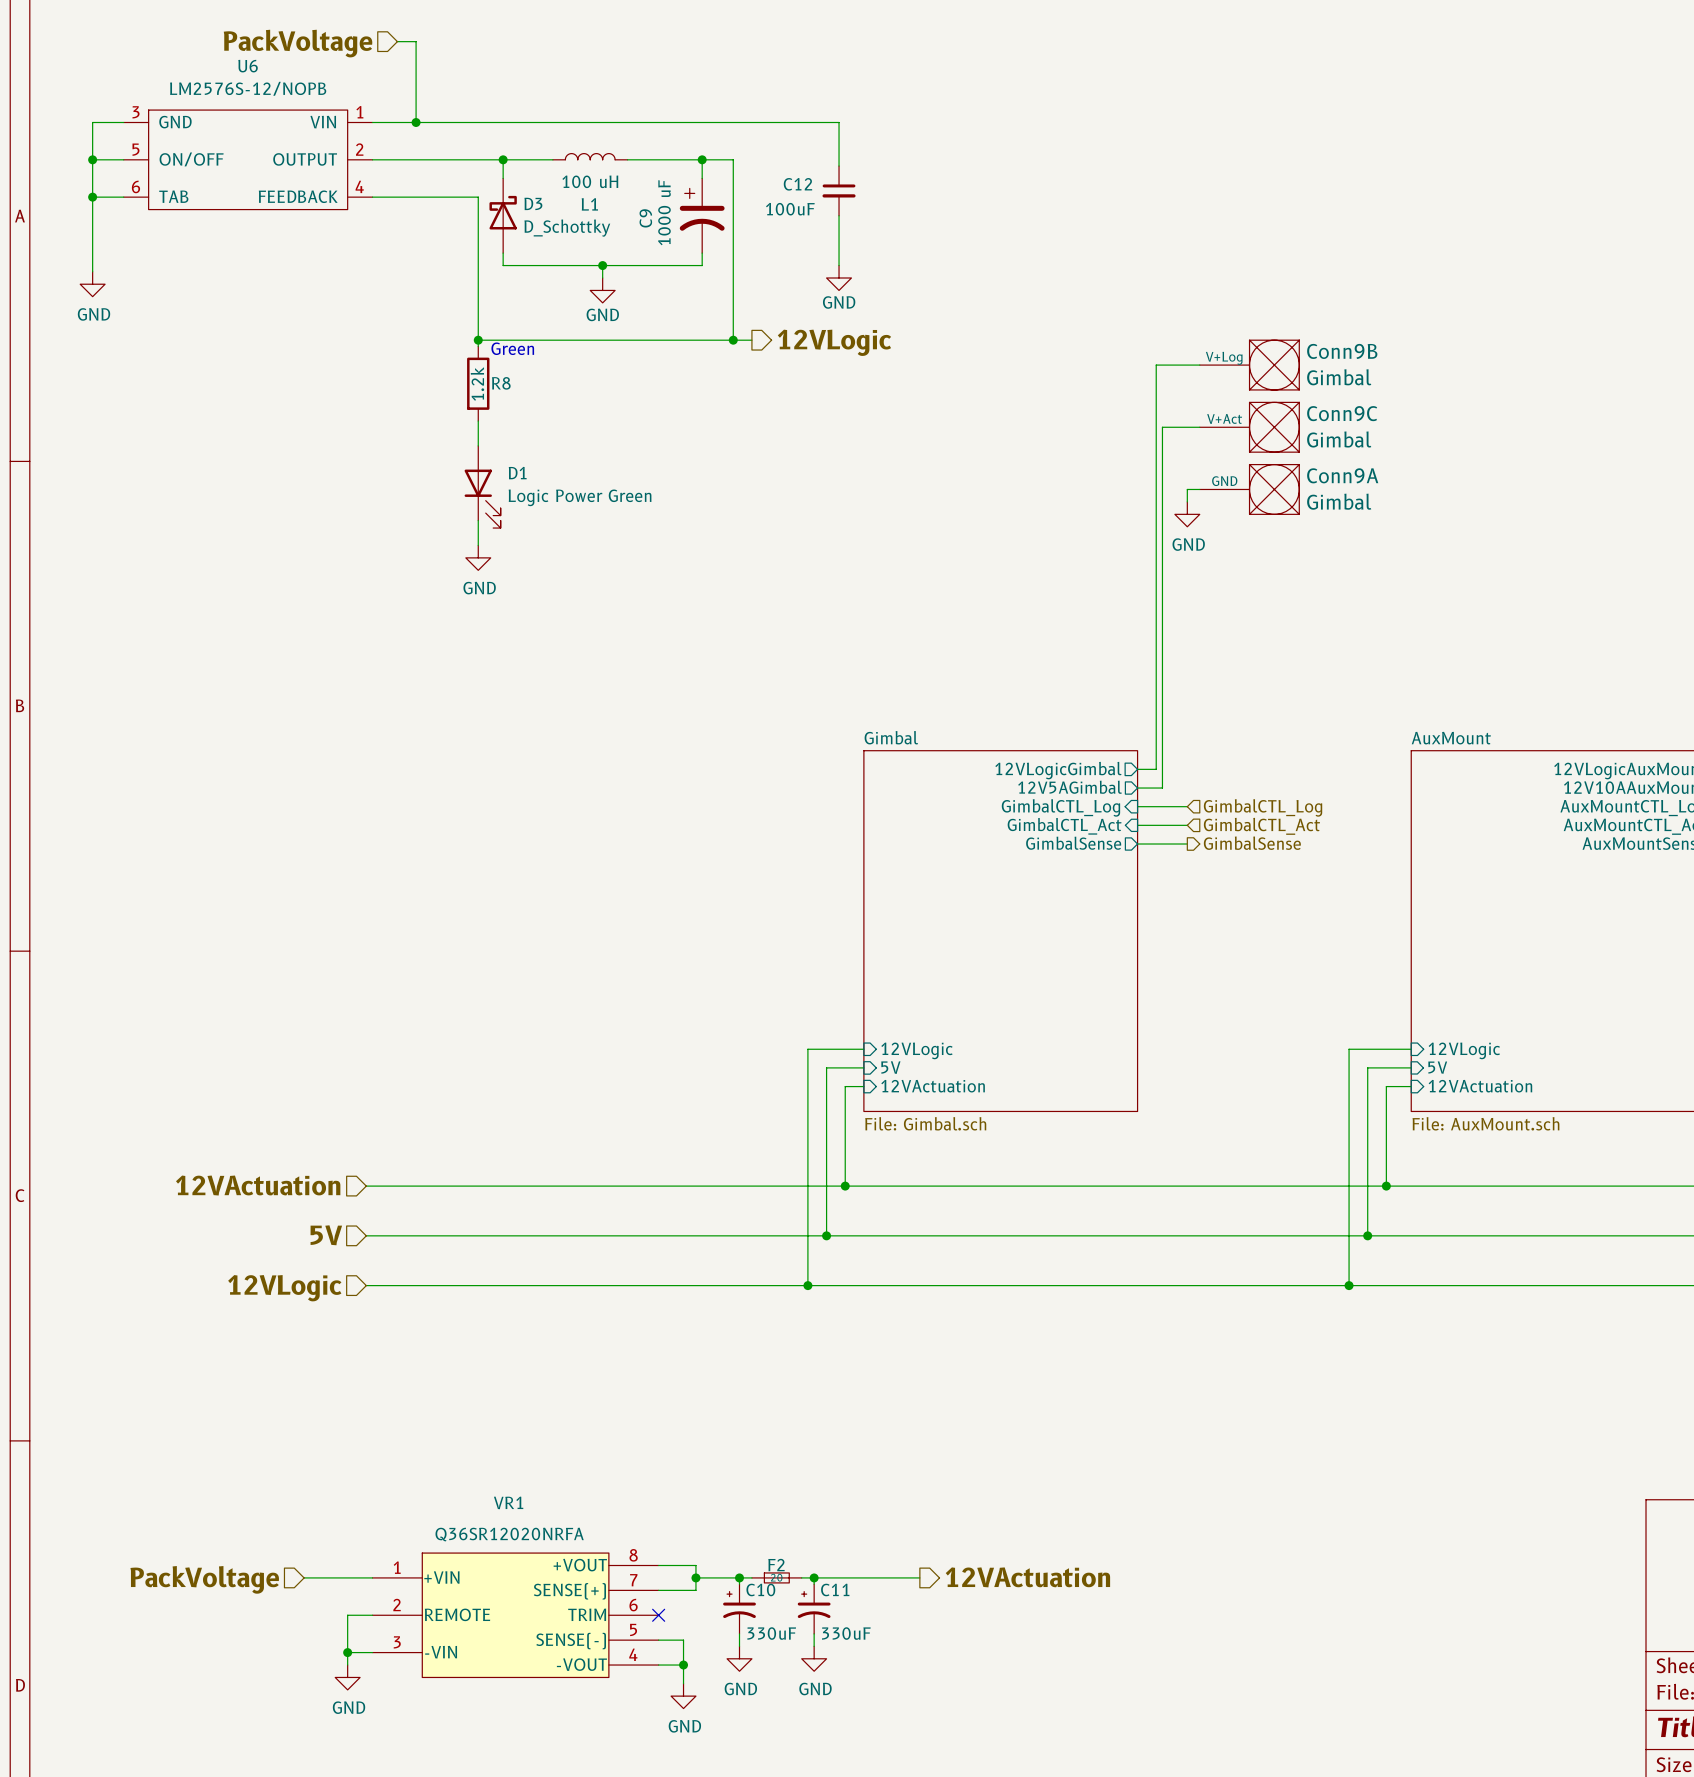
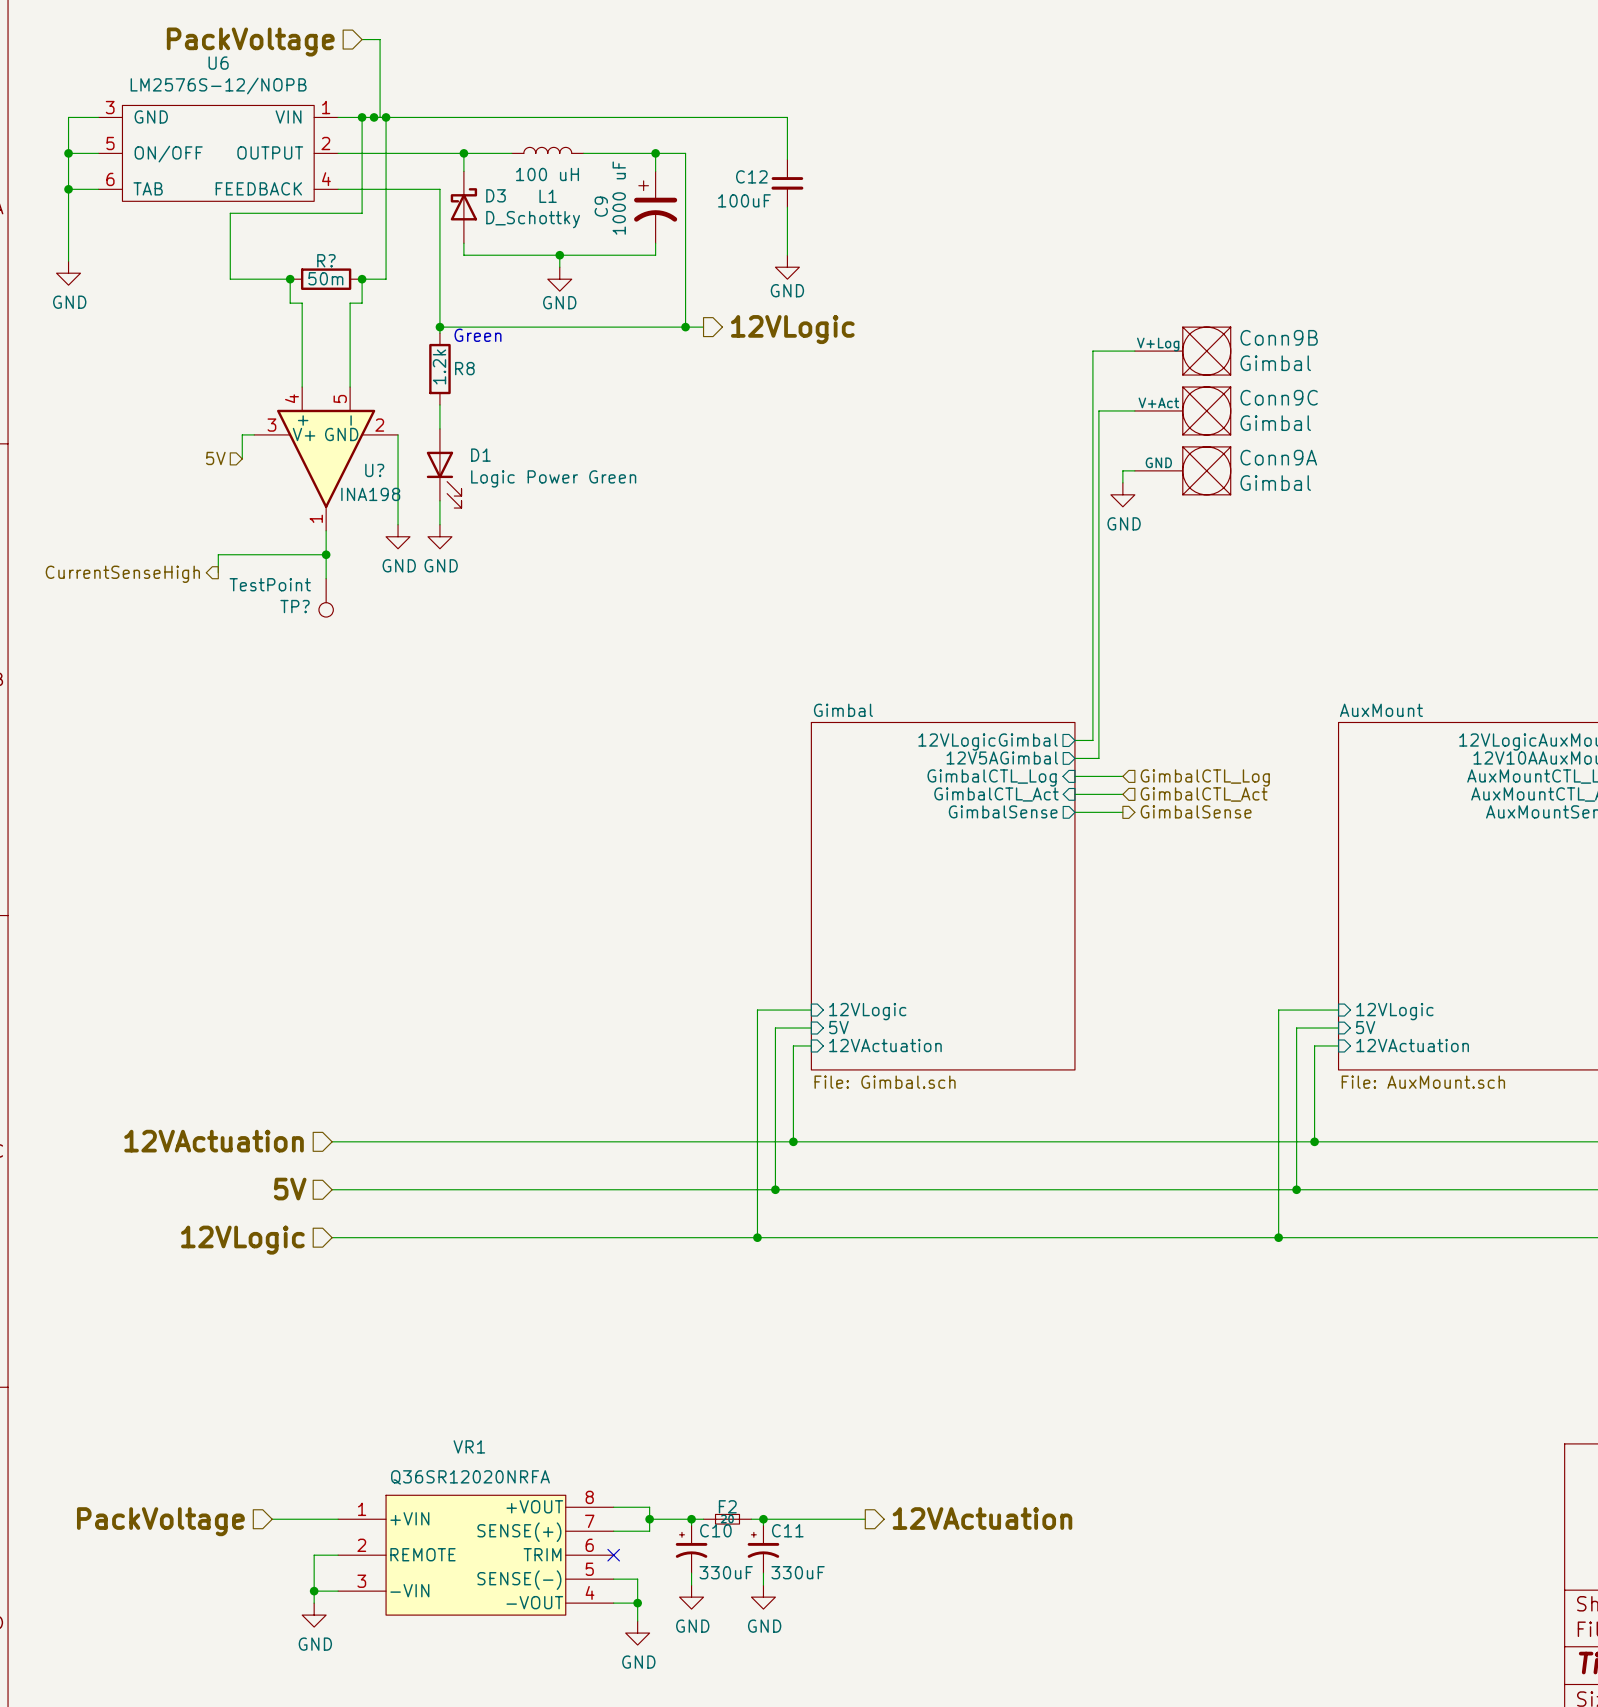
wire: none -> (362, 117) (362, 213) (230, 213) (230, 279) (290, 279) (290, 303) (302, 303) (302, 387)
junction: none -> (362, 117)
junction: none -> (374, 117)
junction: (416, 122) -> none
wire: none -> (386, 117) (386, 279) (362, 279) (362, 303) (350, 303) (350, 387)
junction: none -> (386, 117)
junction: none -> (290, 279)
R?: none -> 50m (326, 279)
junction: none -> (362, 279)
wire: none -> (254, 434) (242, 434) (242, 458)
wire: none -> (398, 434) (398, 524)
hierarchical label: none -> 5V (215, 458)
U?: none -> INA198 (326, 458)
wire: none -> (326, 530) (326, 578)
power symbol: none -> GND (398, 536)
wire: none -> (326, 554) (218, 554) (218, 572)
junction: none -> (326, 554)
hierarchical label: none -> CurrentSenseHigh (122, 574)
TP?: none -> TestPoint (326, 597)

